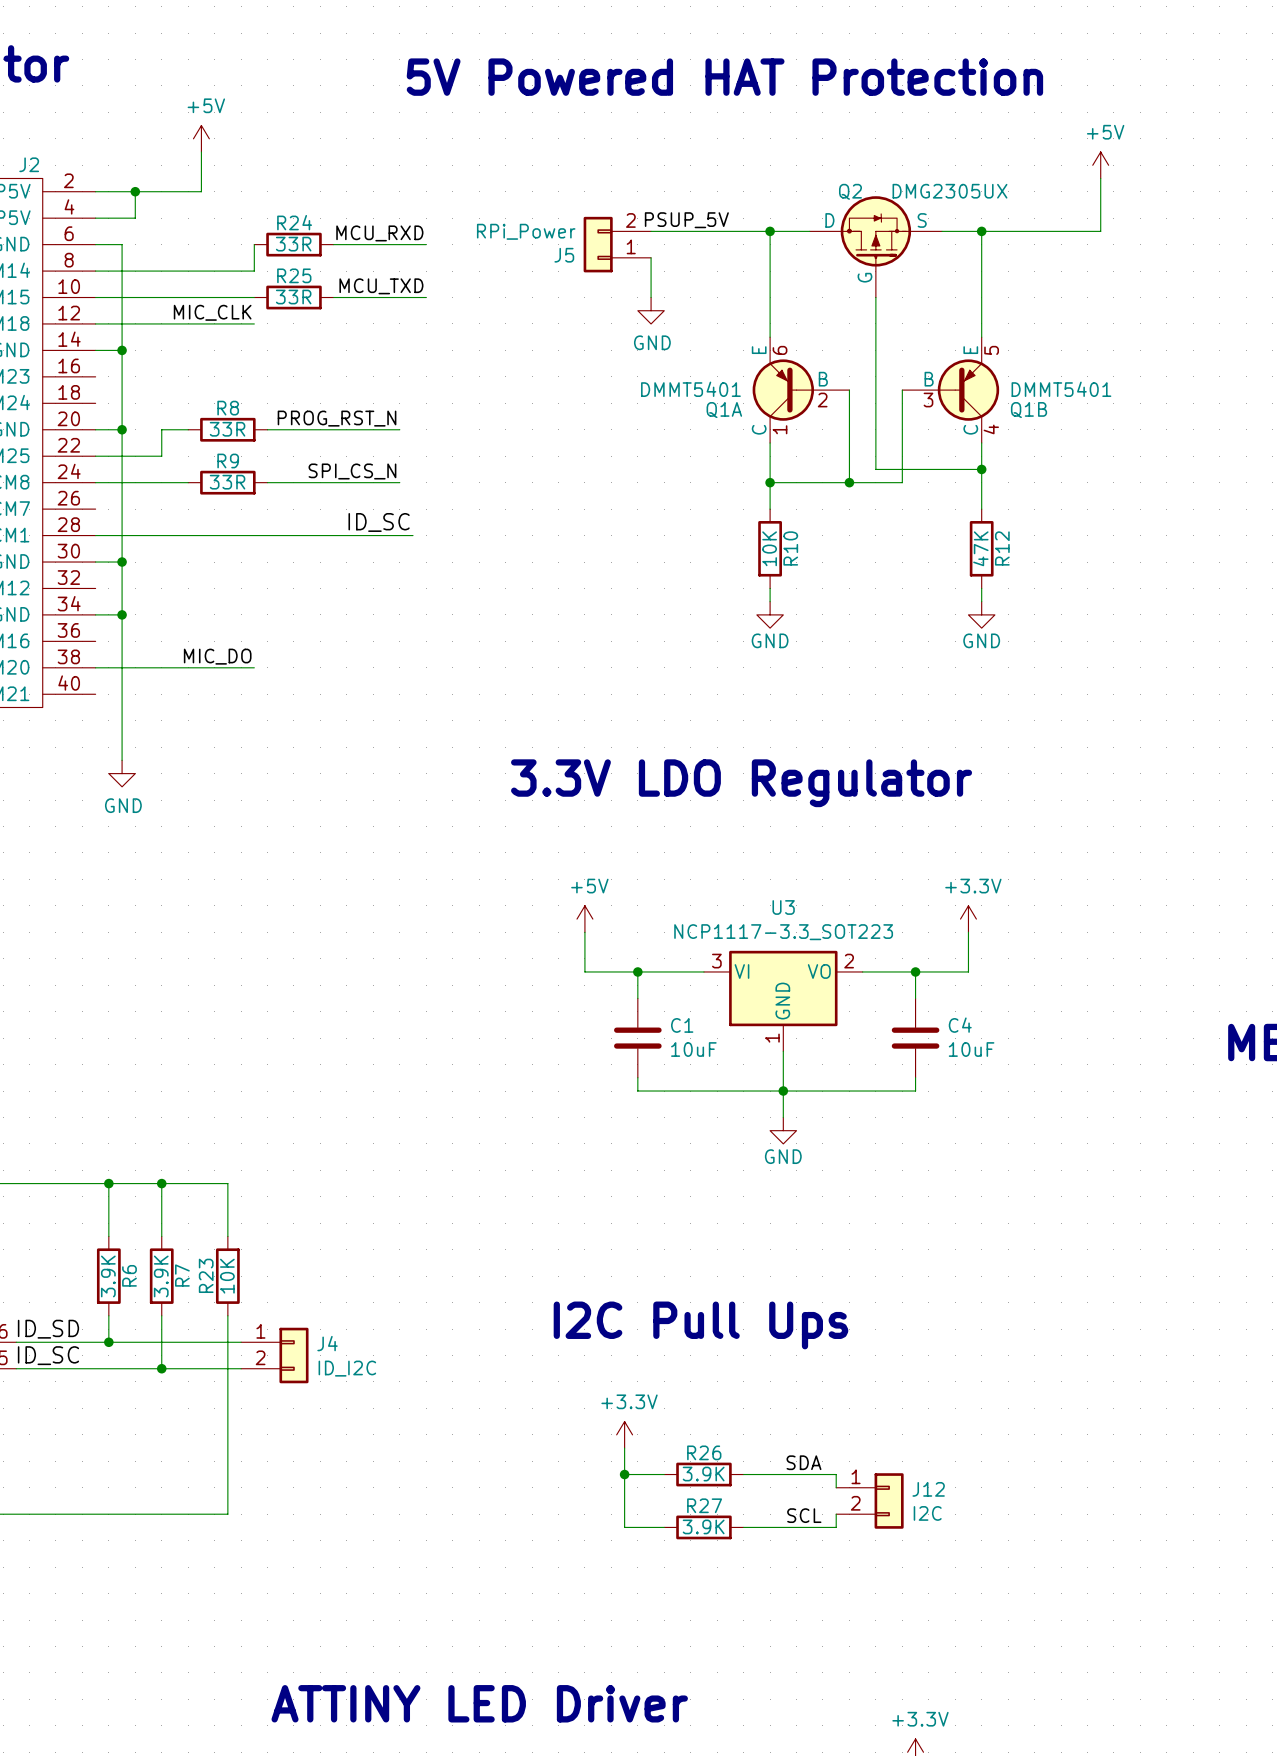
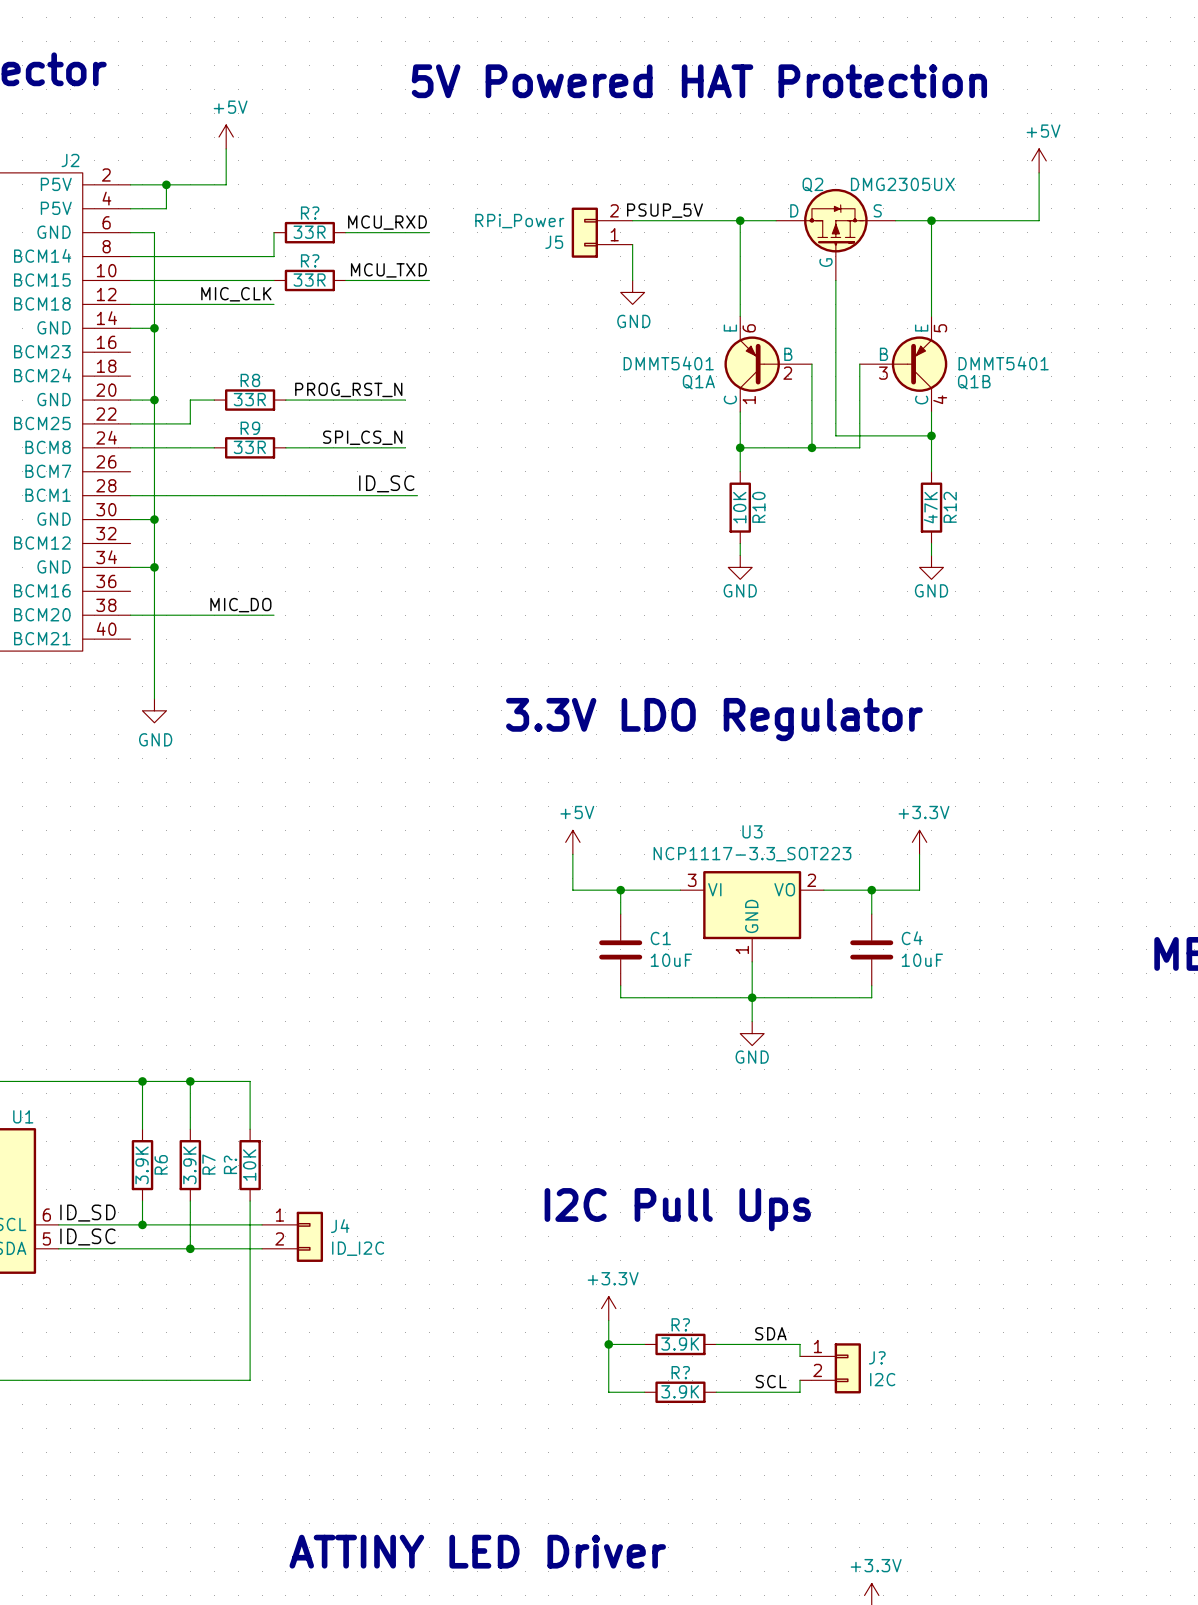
R24 name: R24 (294, 222) -> R? (310, 213)
R25 name: R25 (294, 275) -> R? (310, 260)
R23 name: R23 (206, 1275) -> R? (230, 1164)
R26 name: R26 (704, 1452) -> R? (680, 1324)
J12 name: J12 (928, 1489) -> J? (877, 1357)
R27 name: R27 (704, 1505) -> R? (680, 1372)

